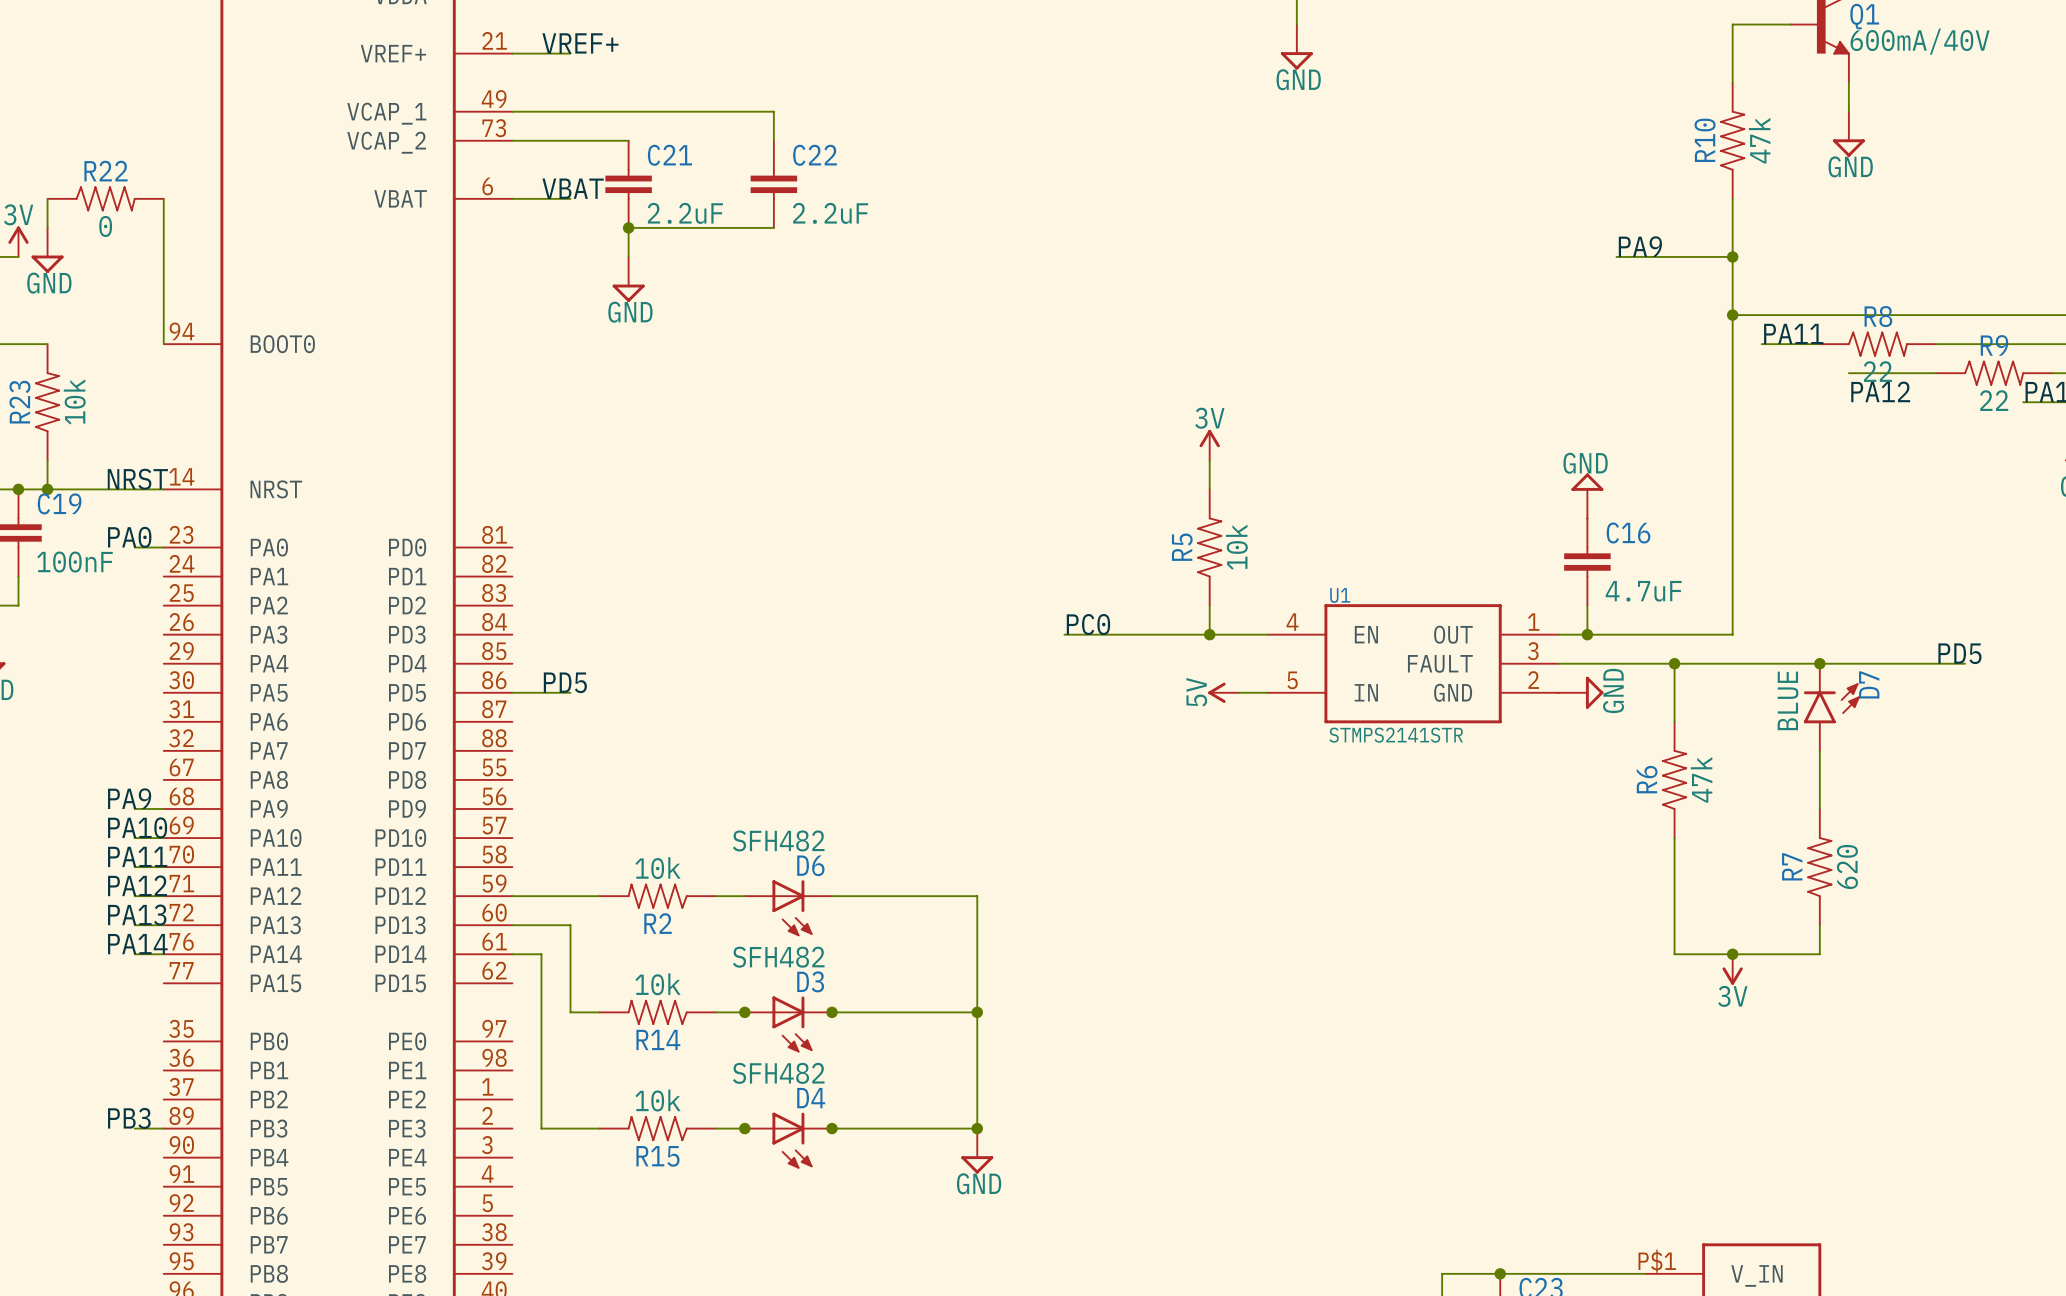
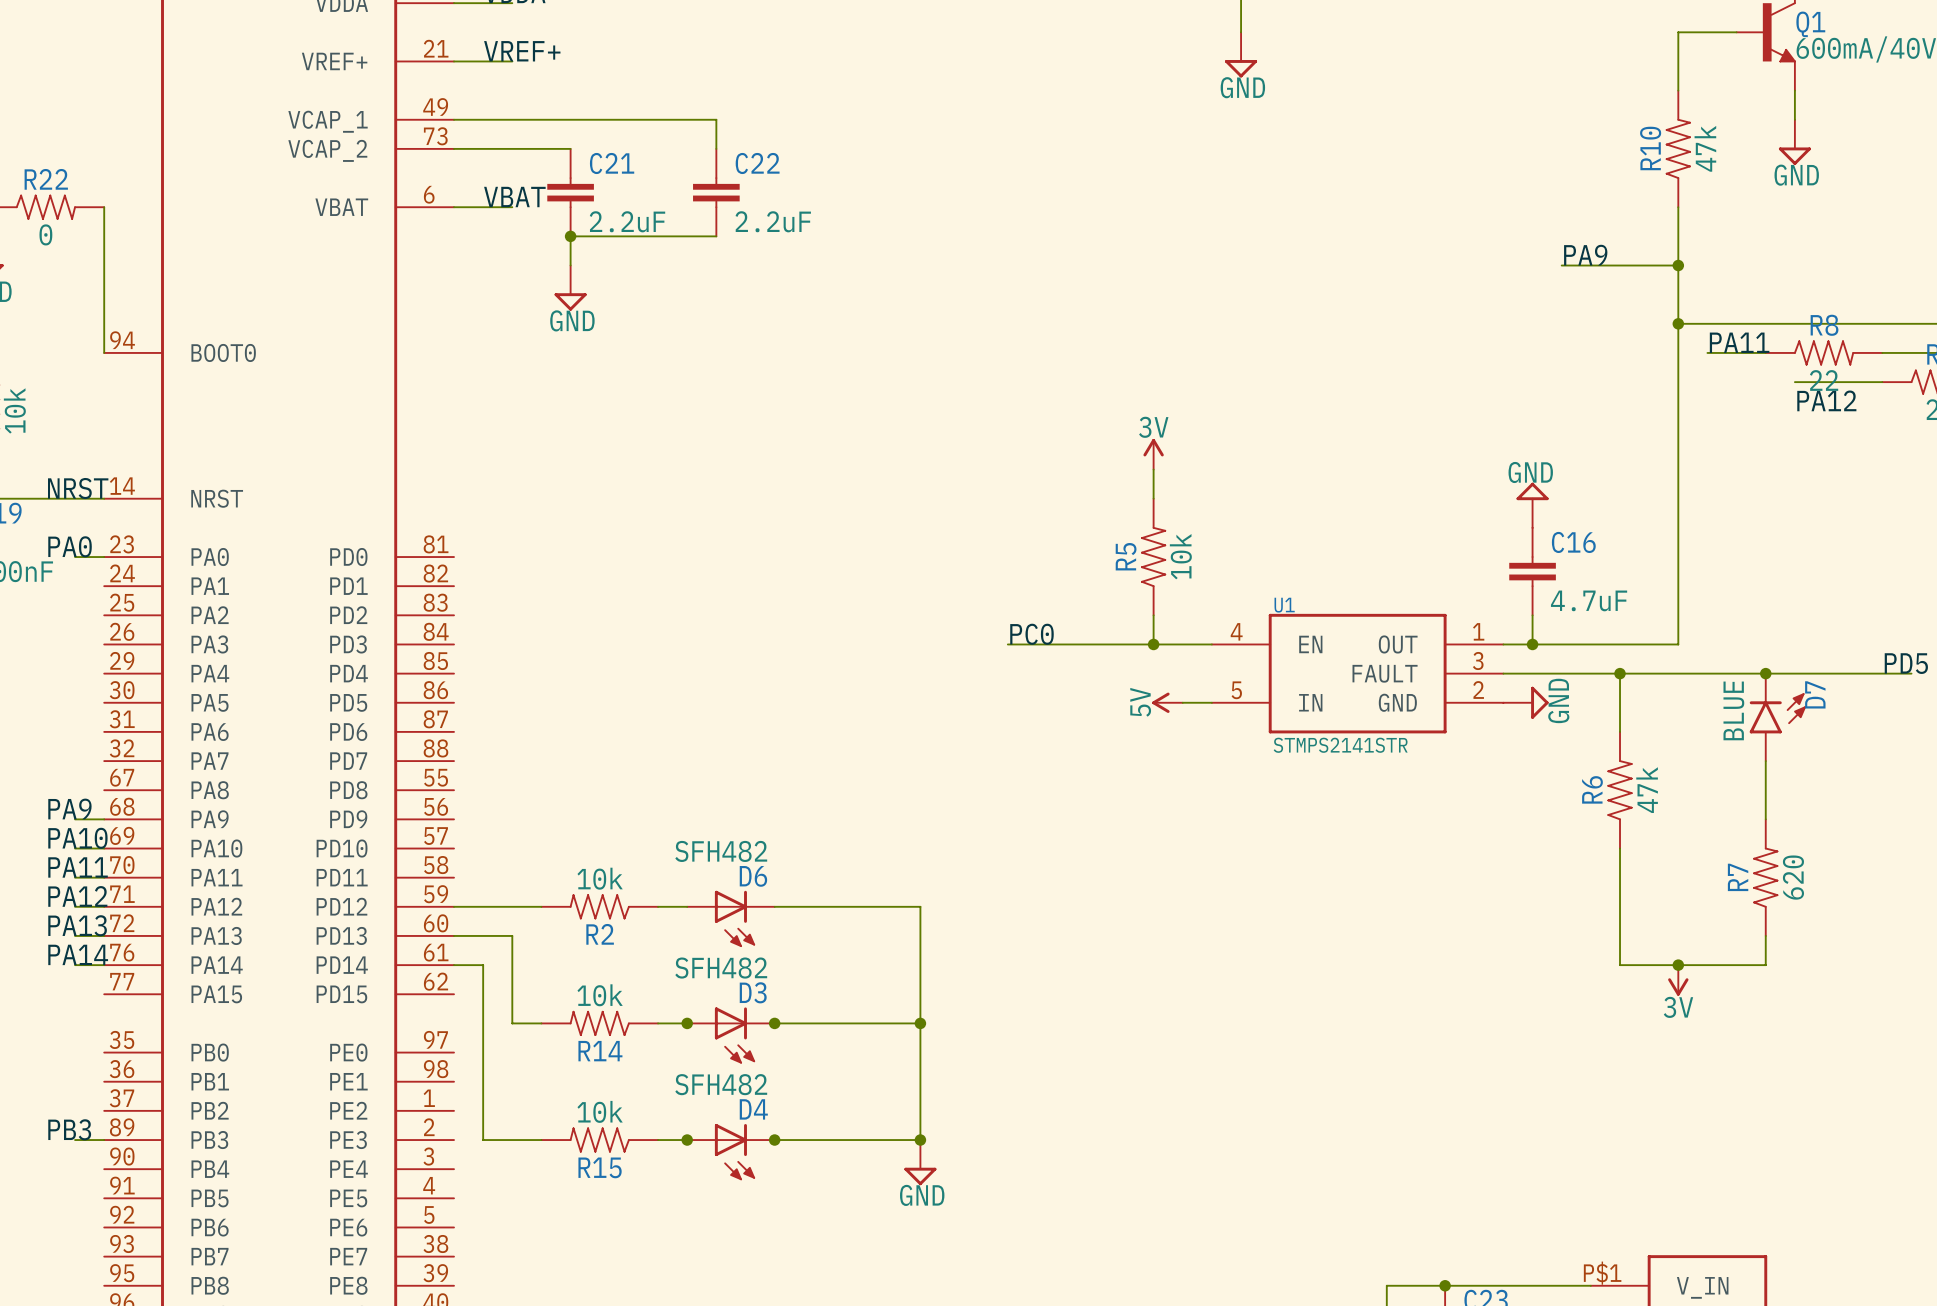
label: PD5 (565, 682) -> none
wire: (512, 692) (570, 692) -> none

